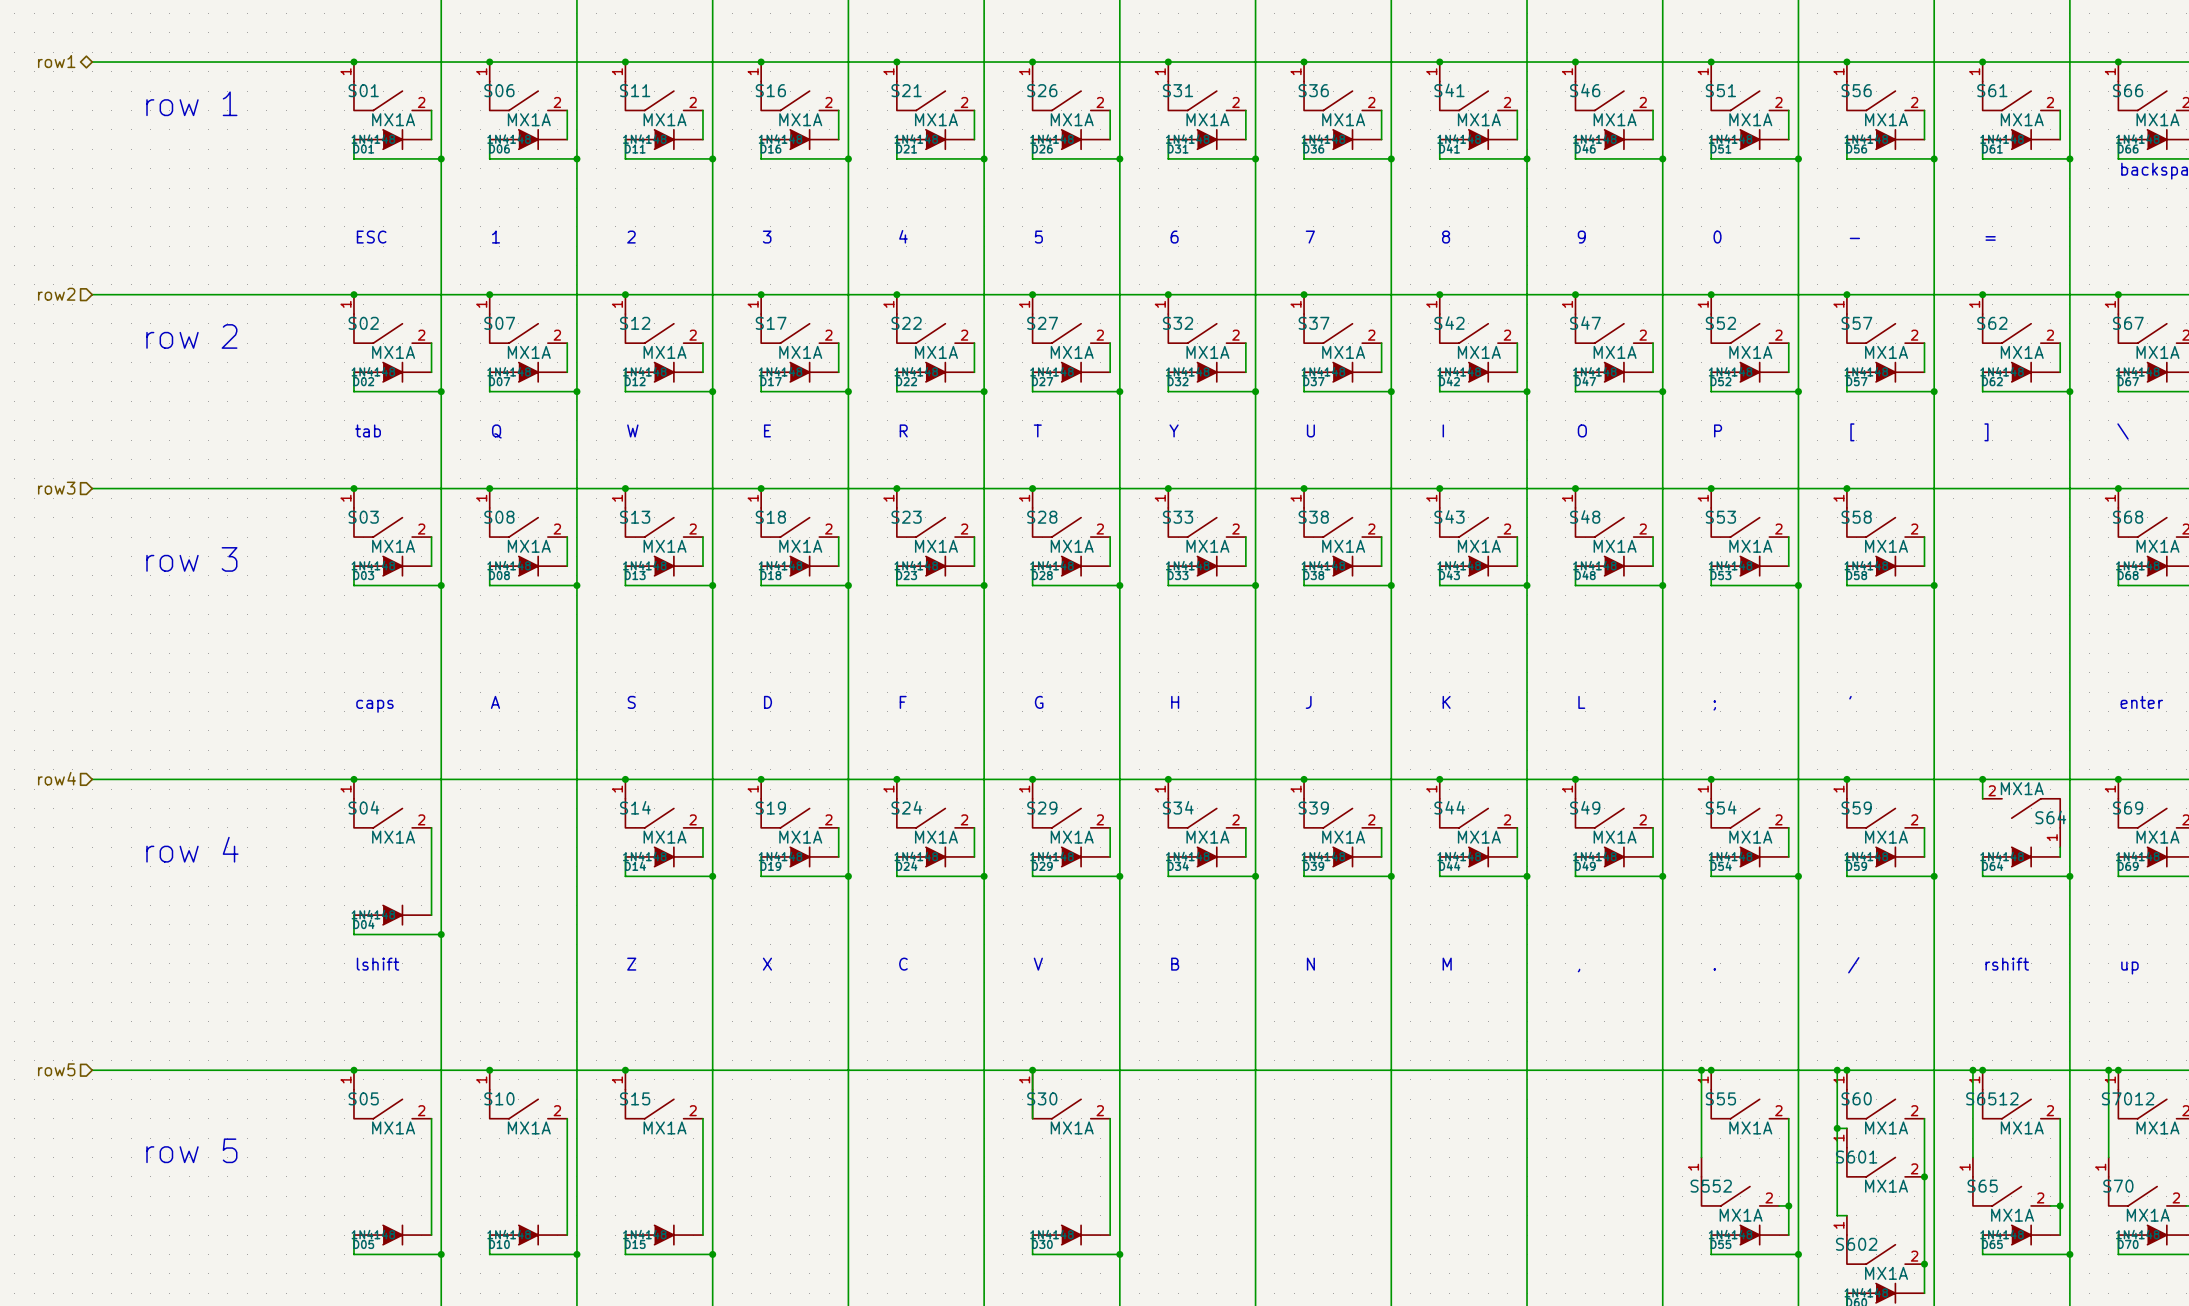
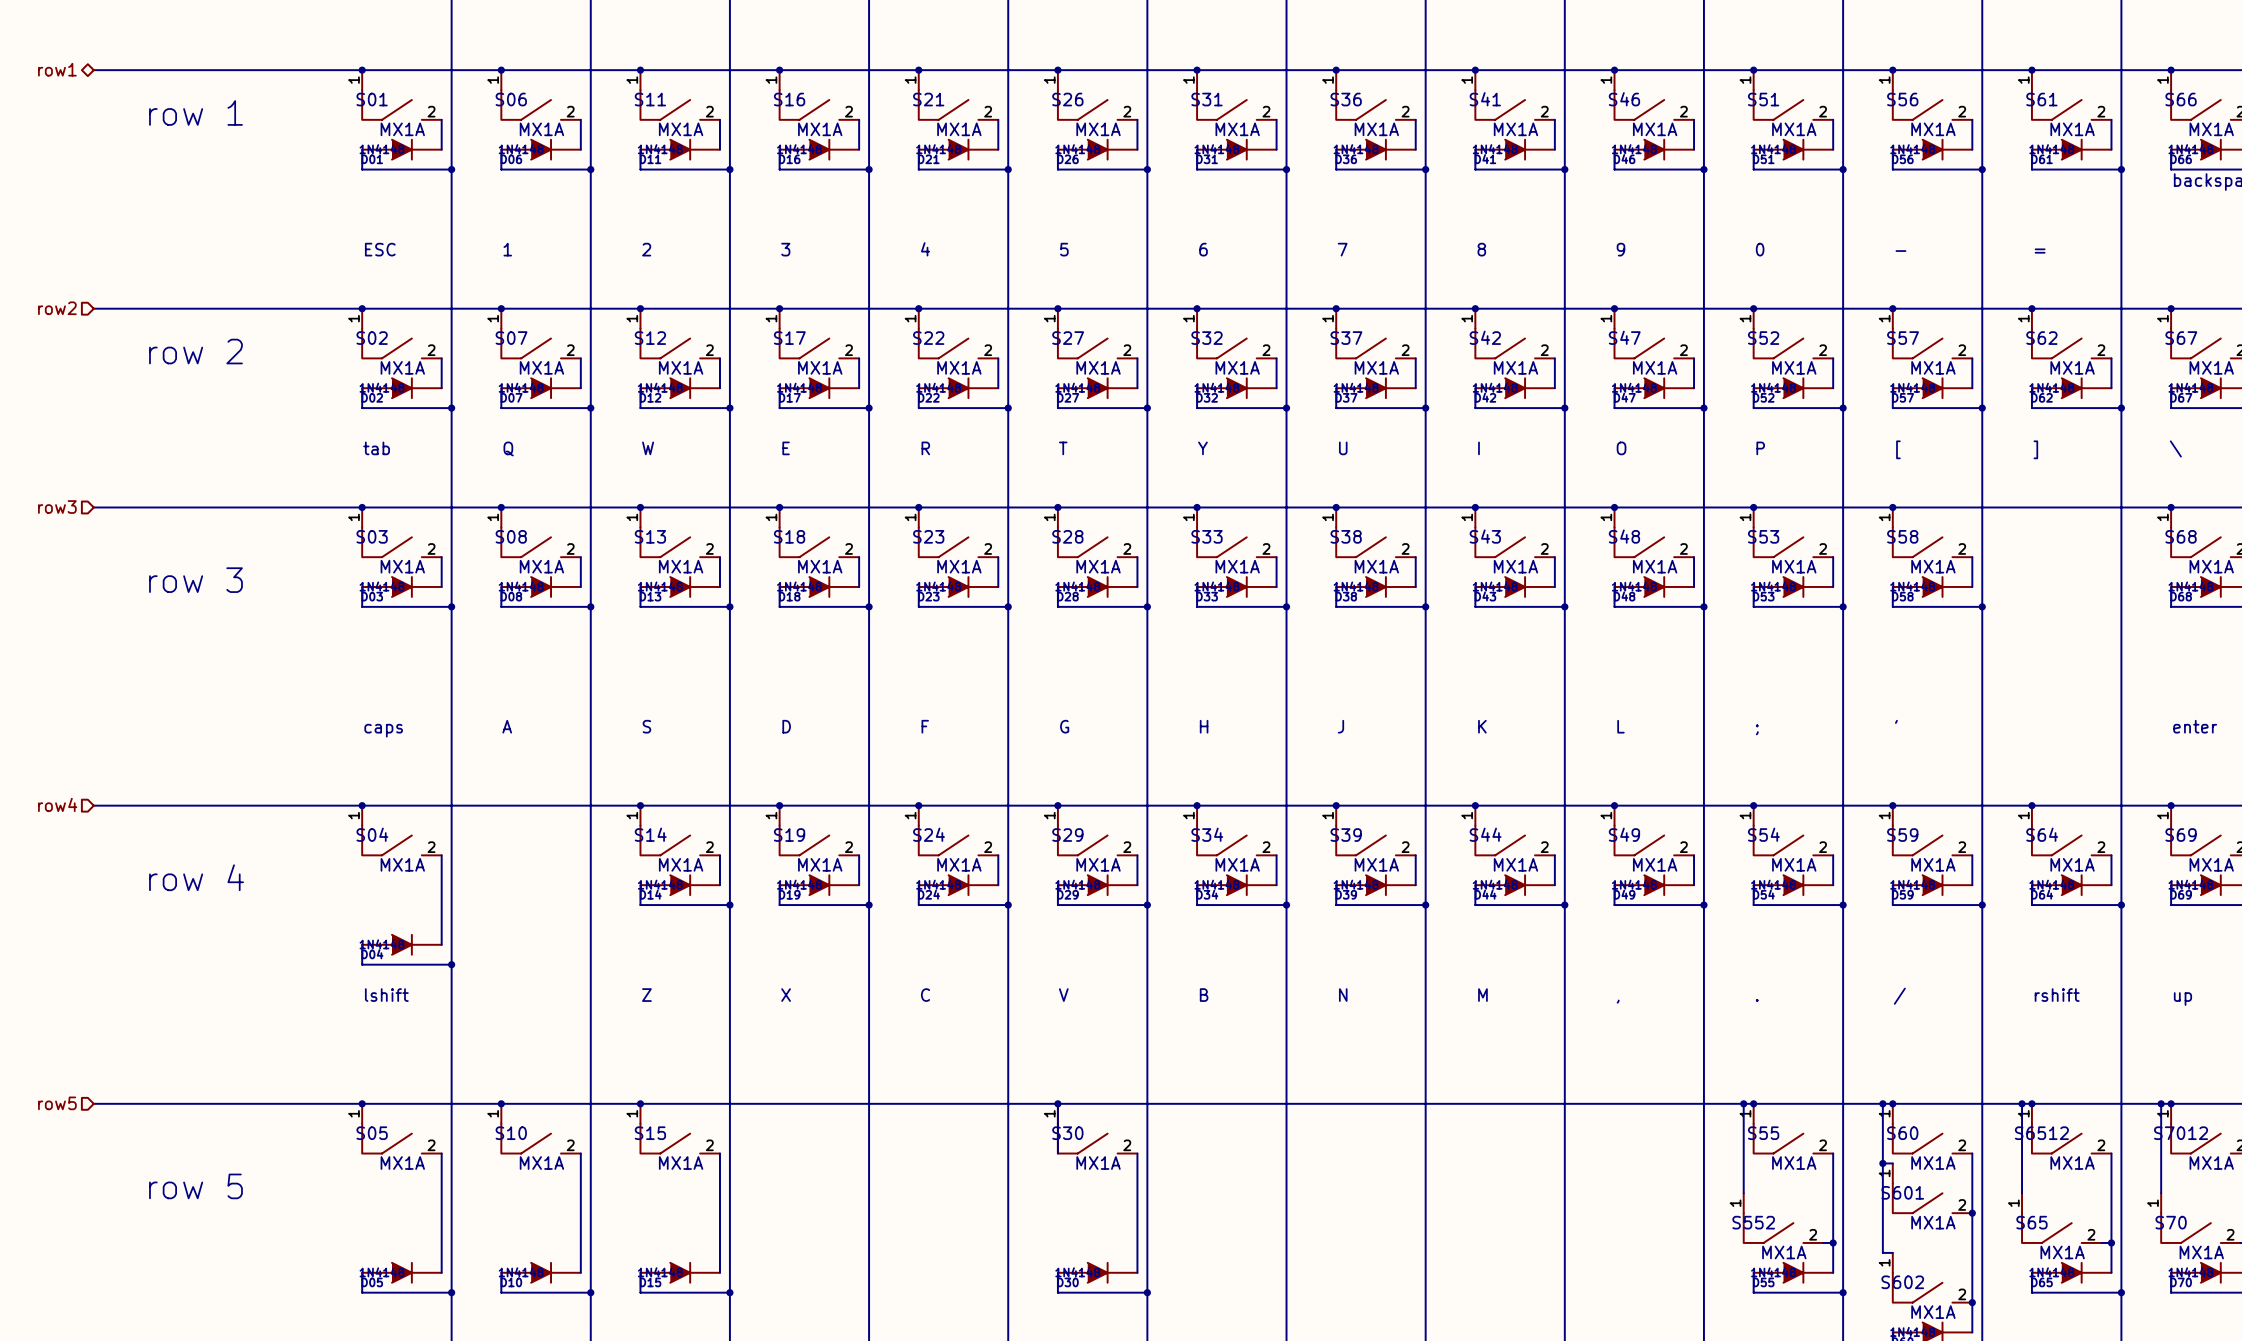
S64 rotation: 0° (2035, 813) -> 180° (2056, 840)

